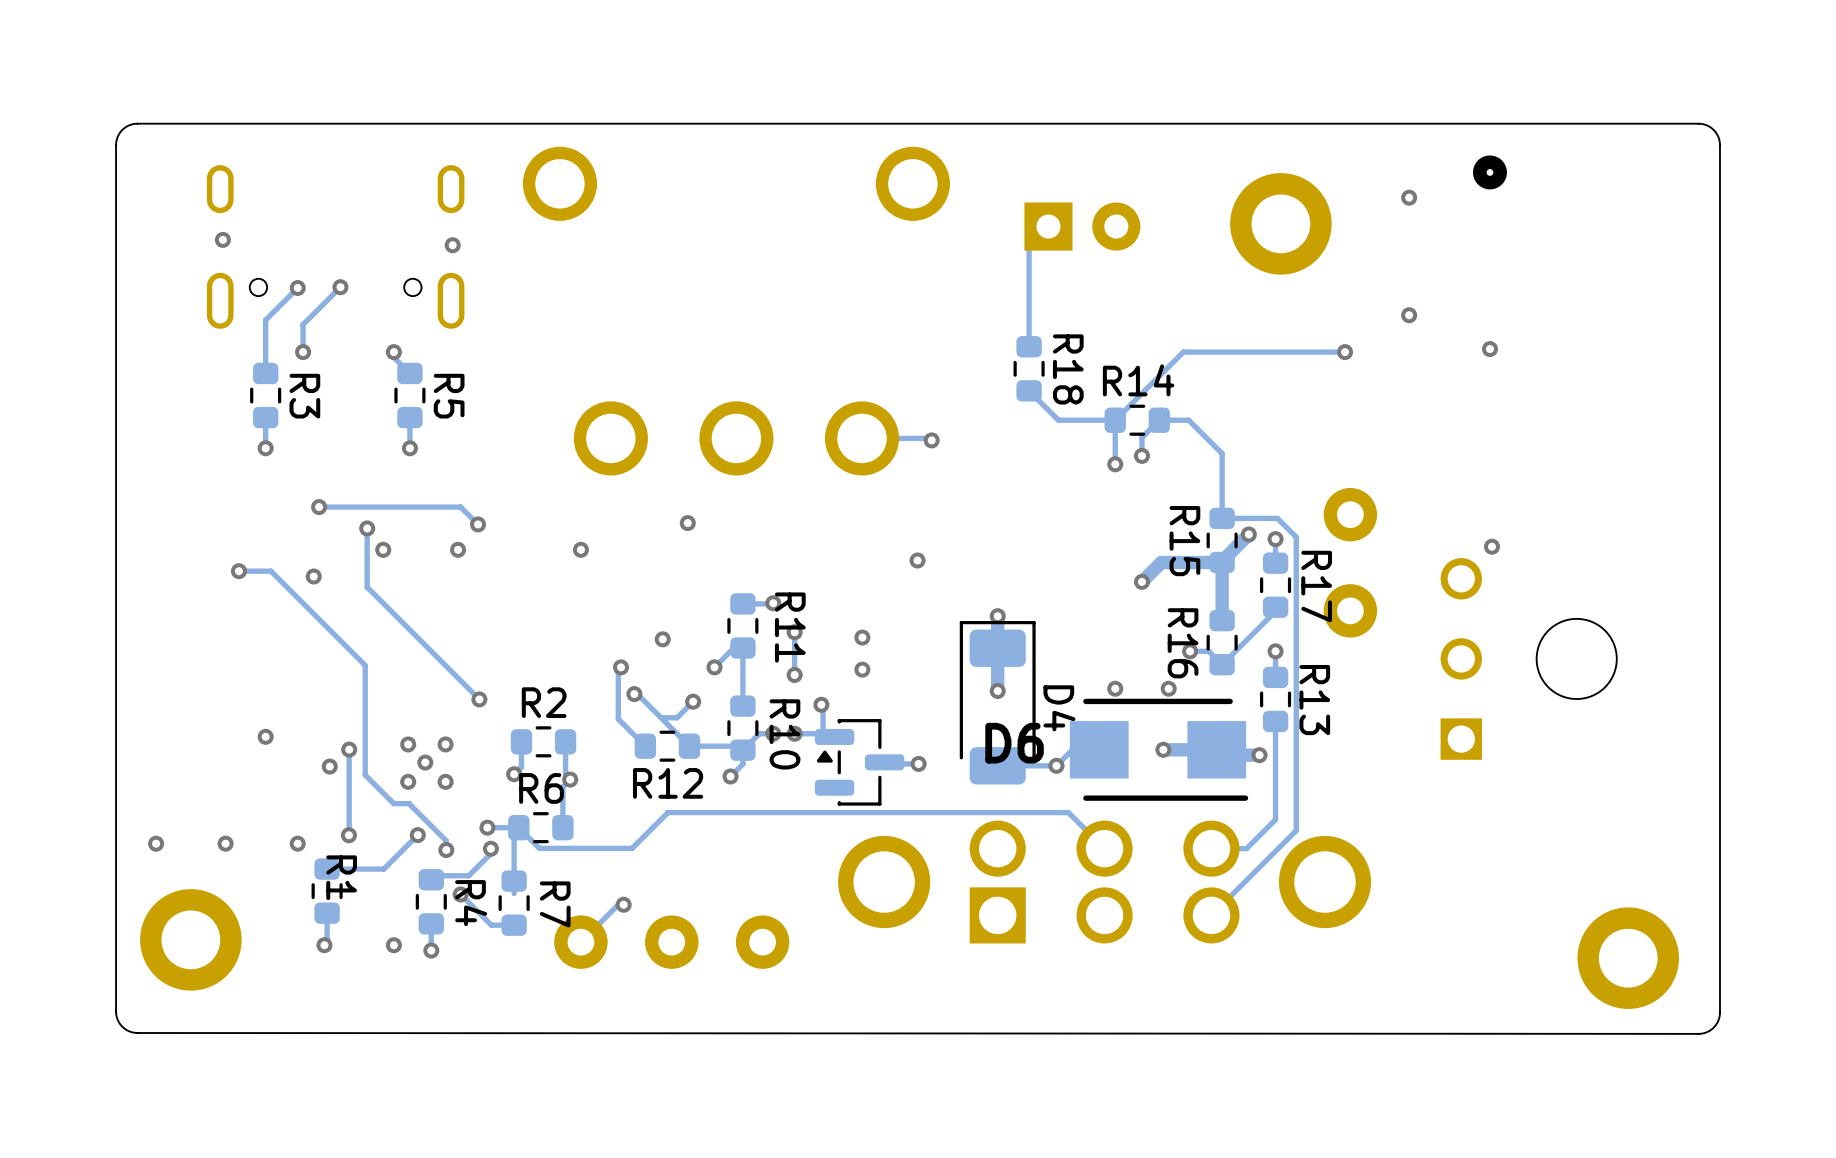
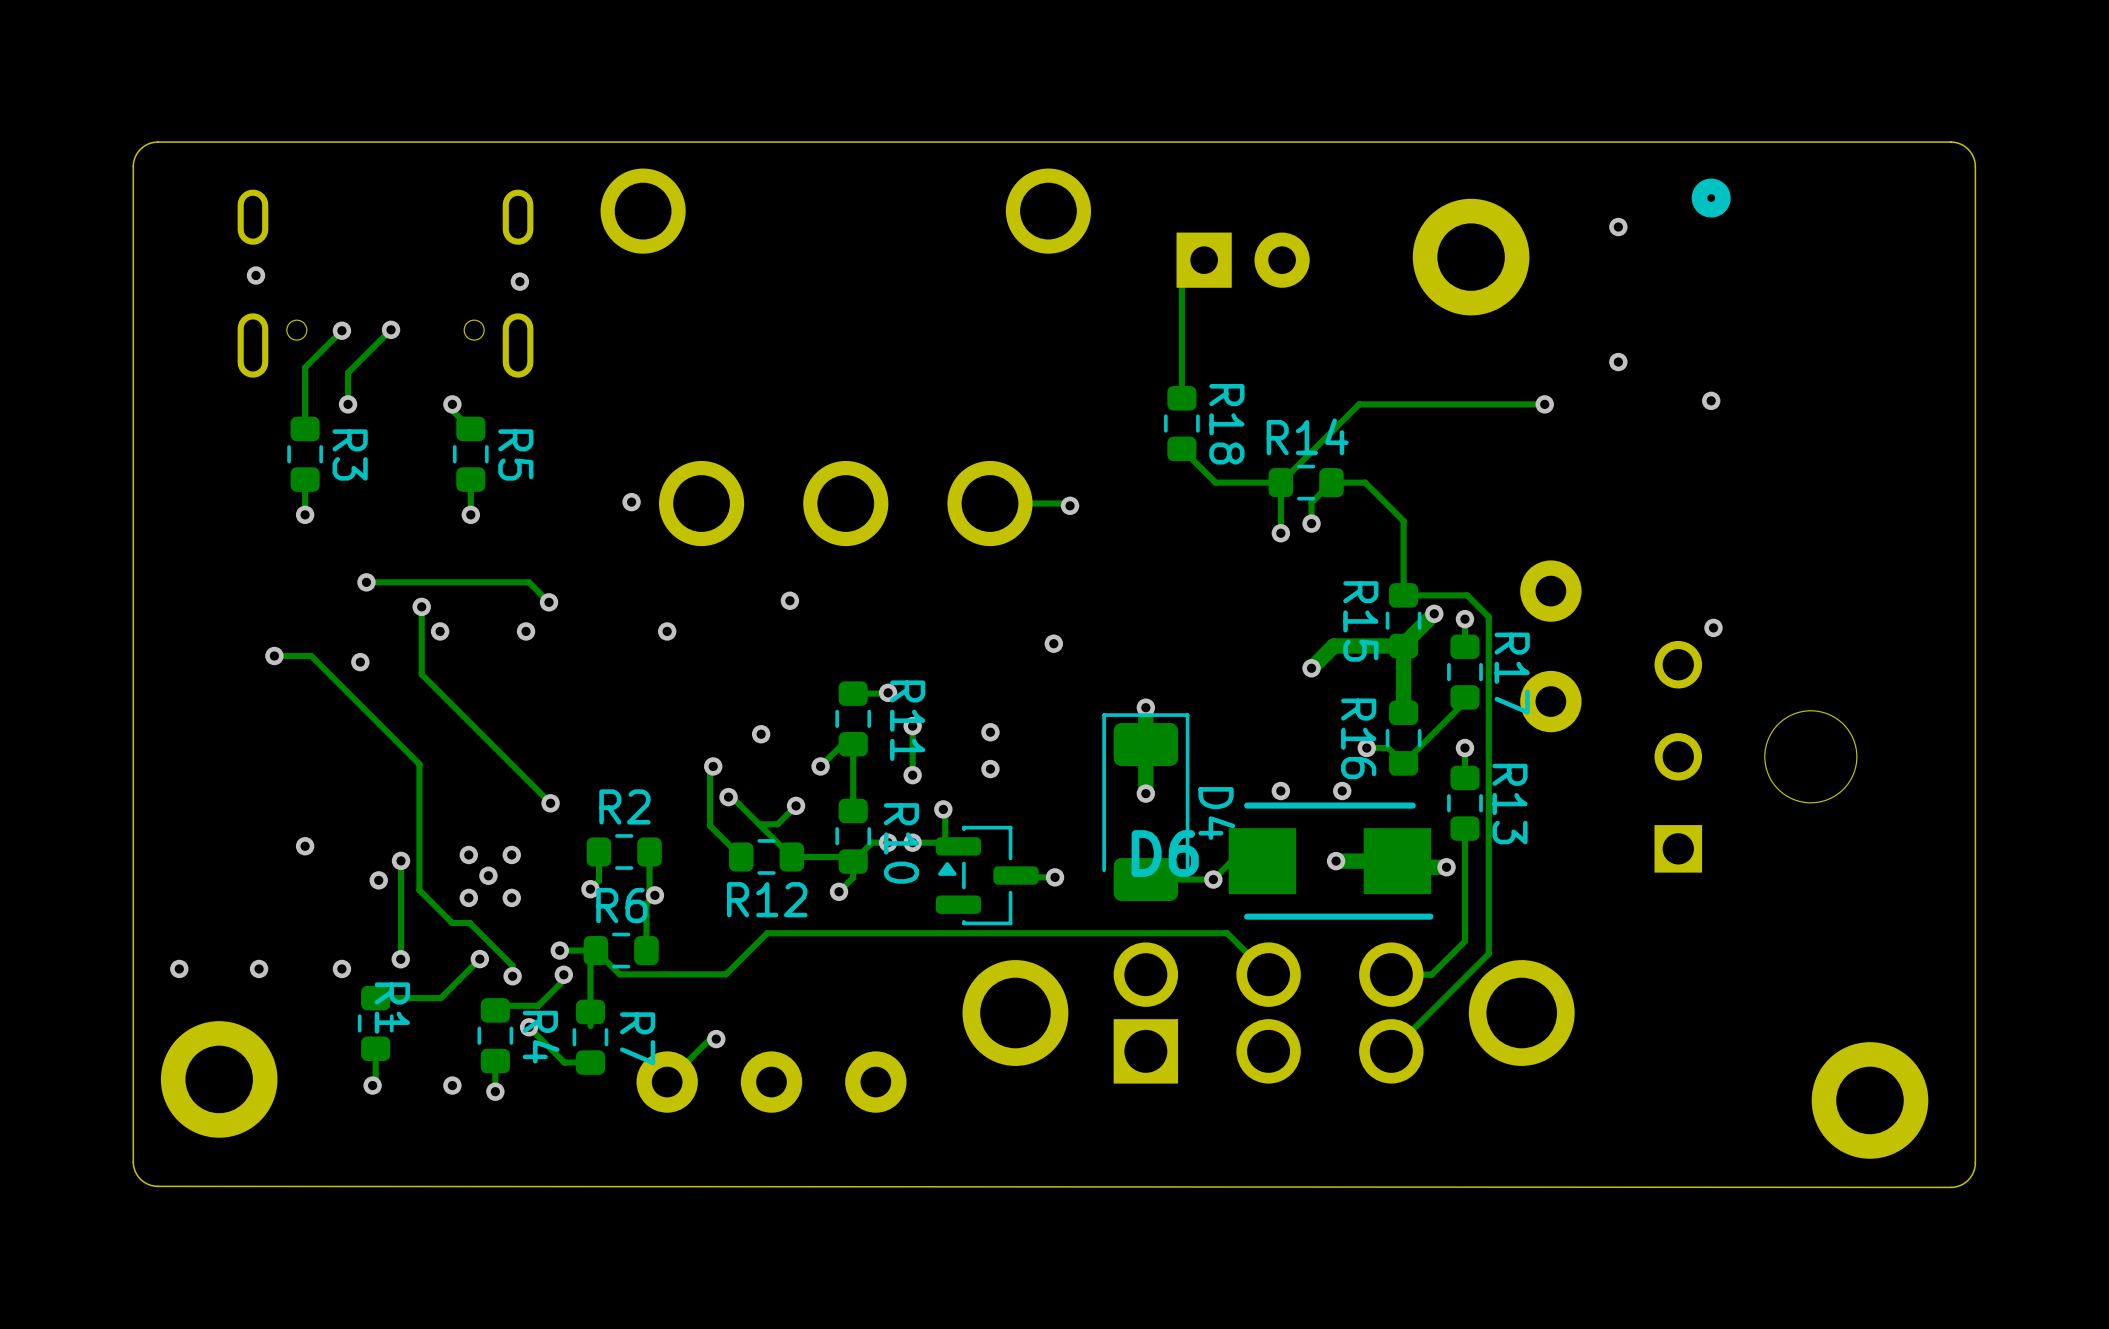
via: none -> (631, 502)

